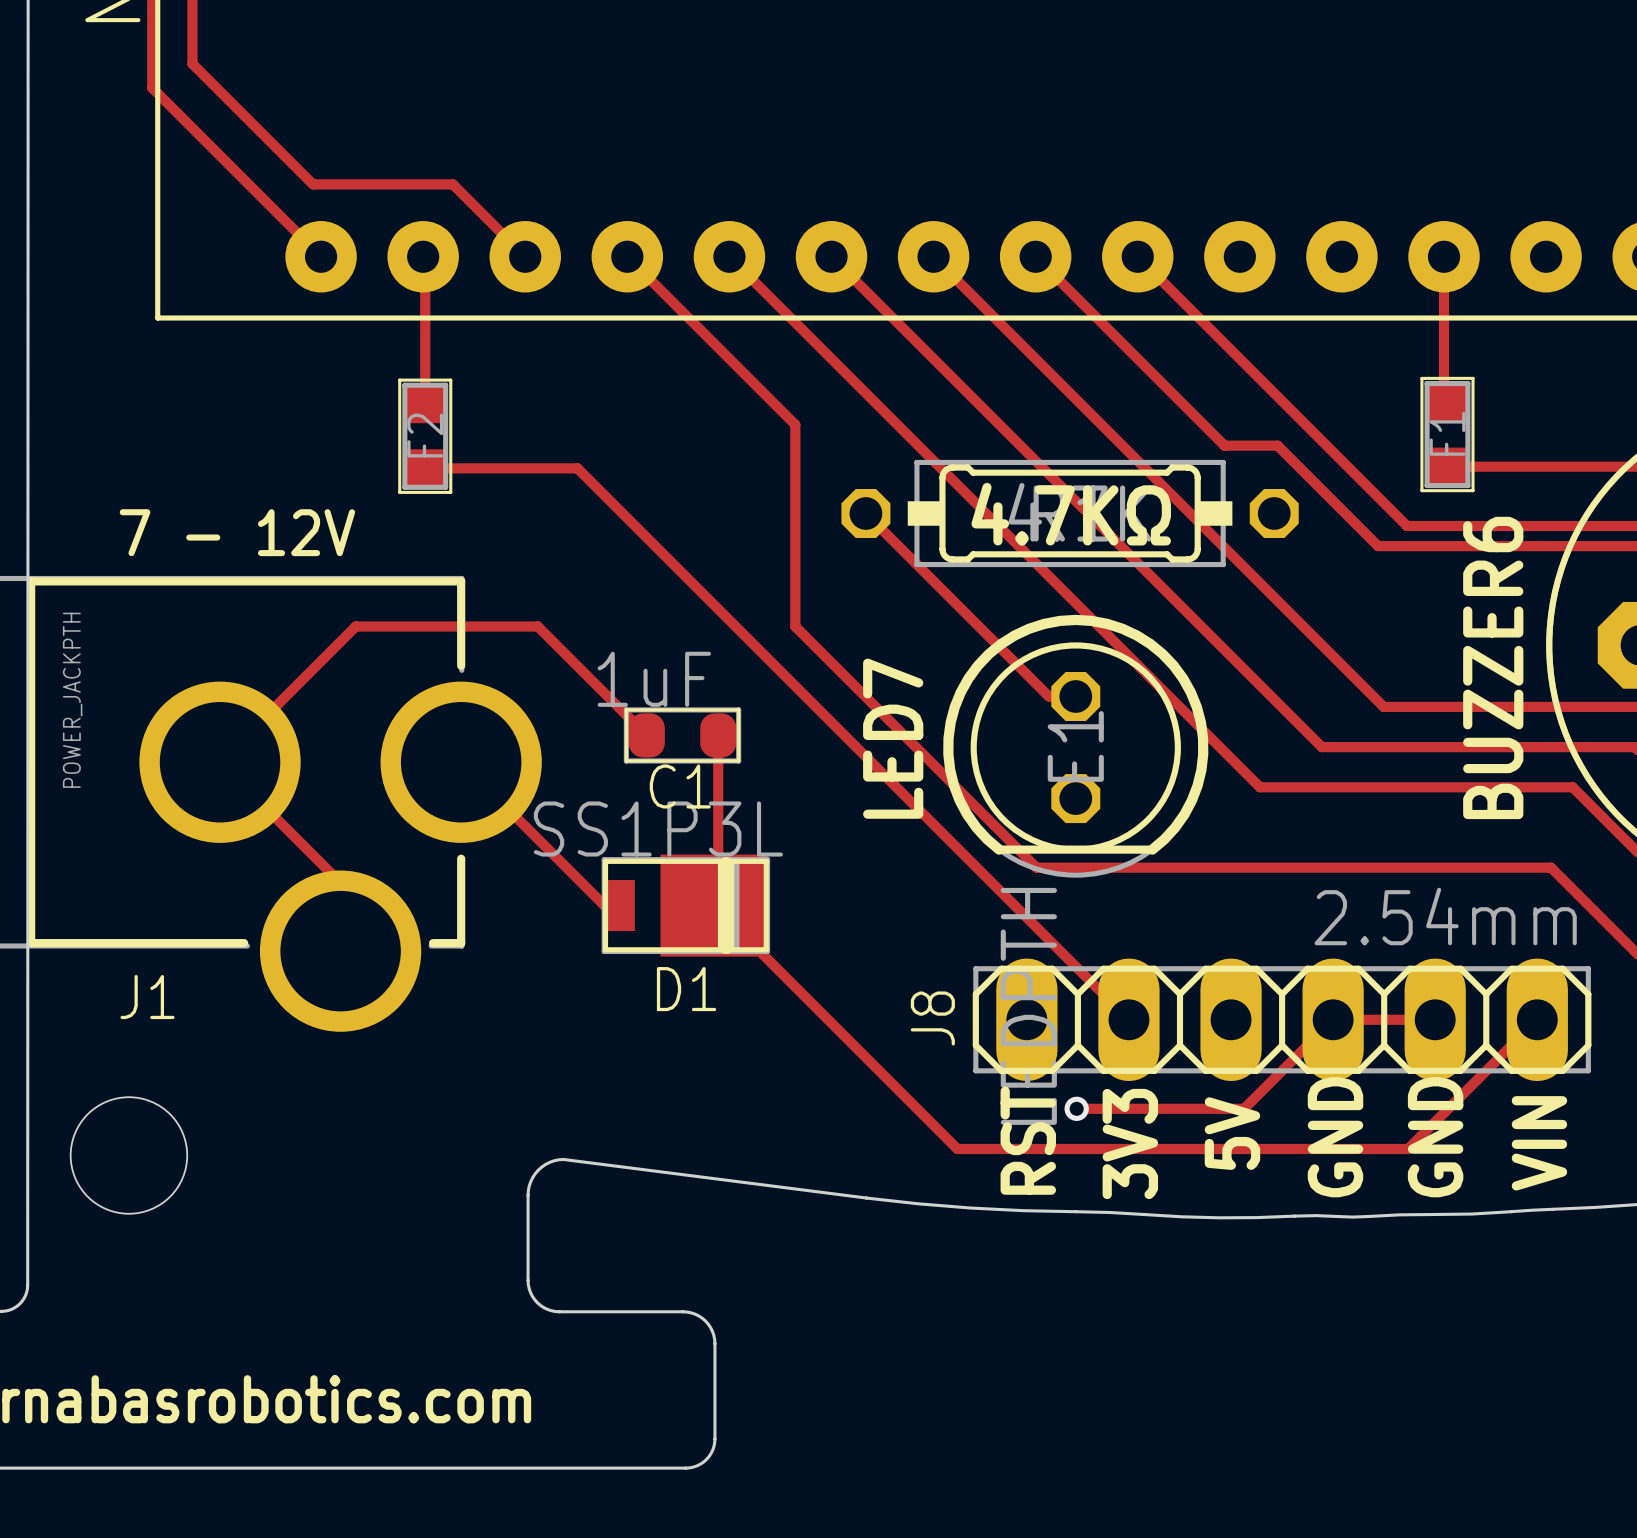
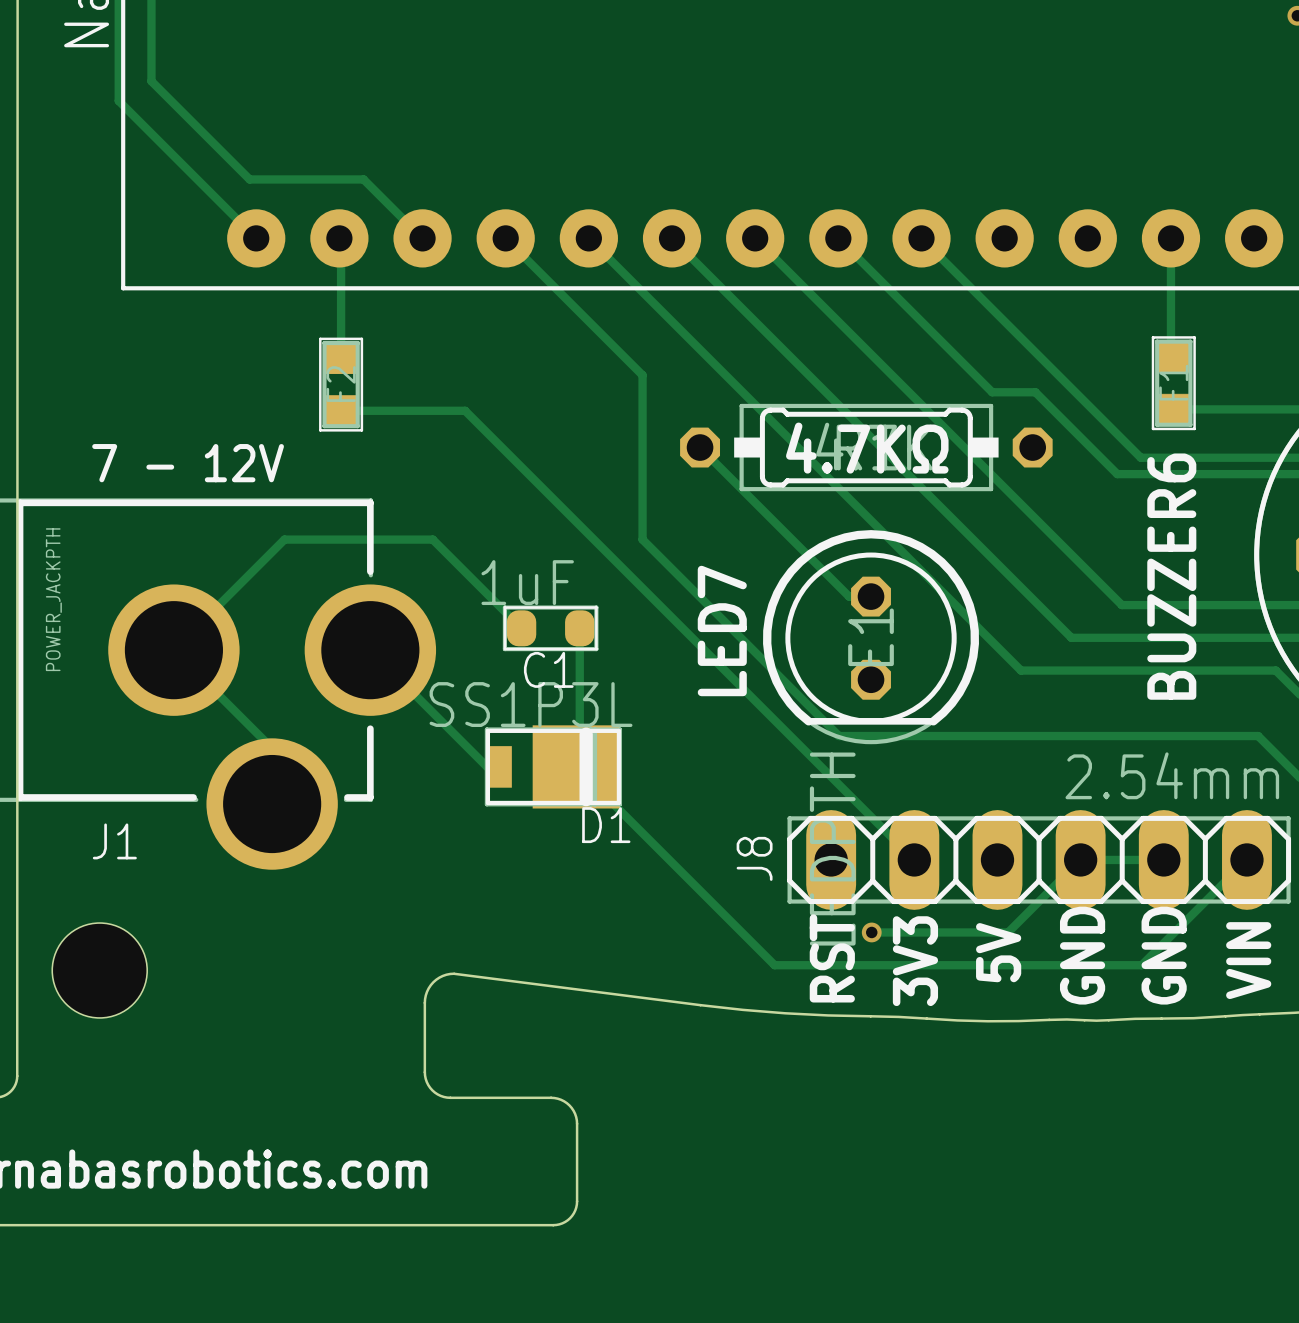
text position: BUZZER6 (1493, 667) -> BUZZER6 (1171, 576)
D1 name position: D1 (686, 989) -> D1 (606, 825)

